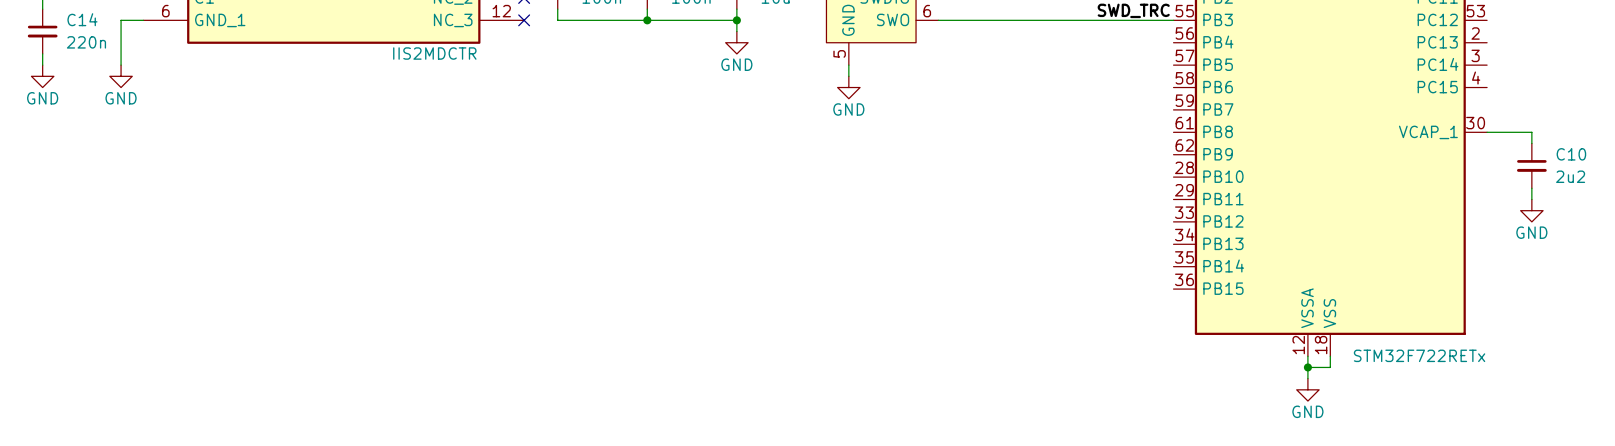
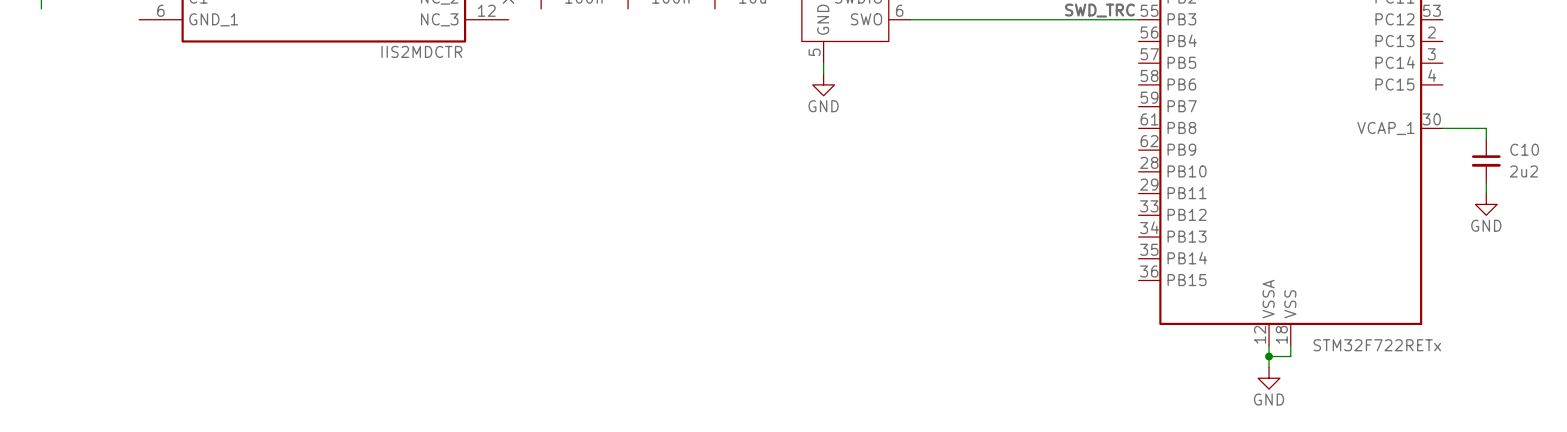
wire: (557, 9) (557, 20) (736, 20) -> none
wire: (647, 9) (647, 20) -> none
wire: (736, 9) (736, 31) -> none
wire: (143, 20) (121, 20) (121, 65) -> none
no-connect mark: (524, 20) -> none
junction: (647, 20) -> none
junction: (736, 20) -> none
C14: 220n (42, 31) -> none
power symbol: GND (736, 42) -> none
wire: (42, 53) (42, 65) -> none
power symbol: GND (42, 76) -> none
power symbol: GND (121, 76) -> none

